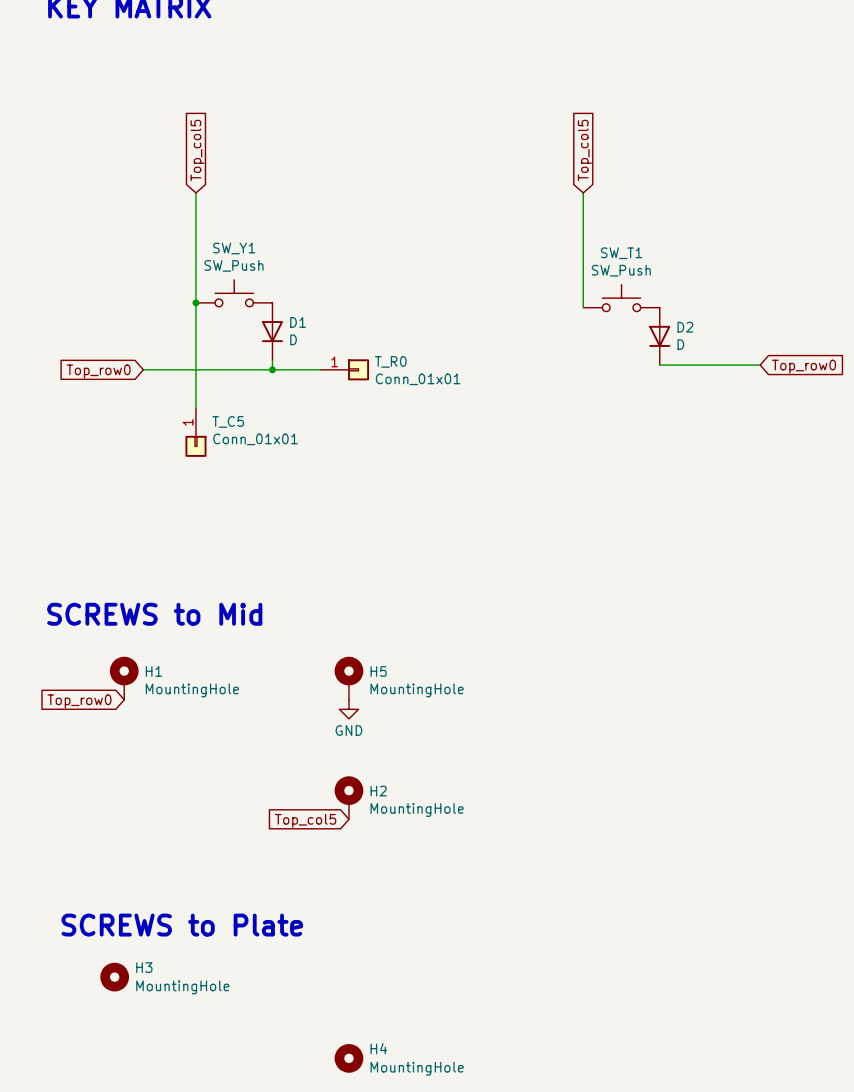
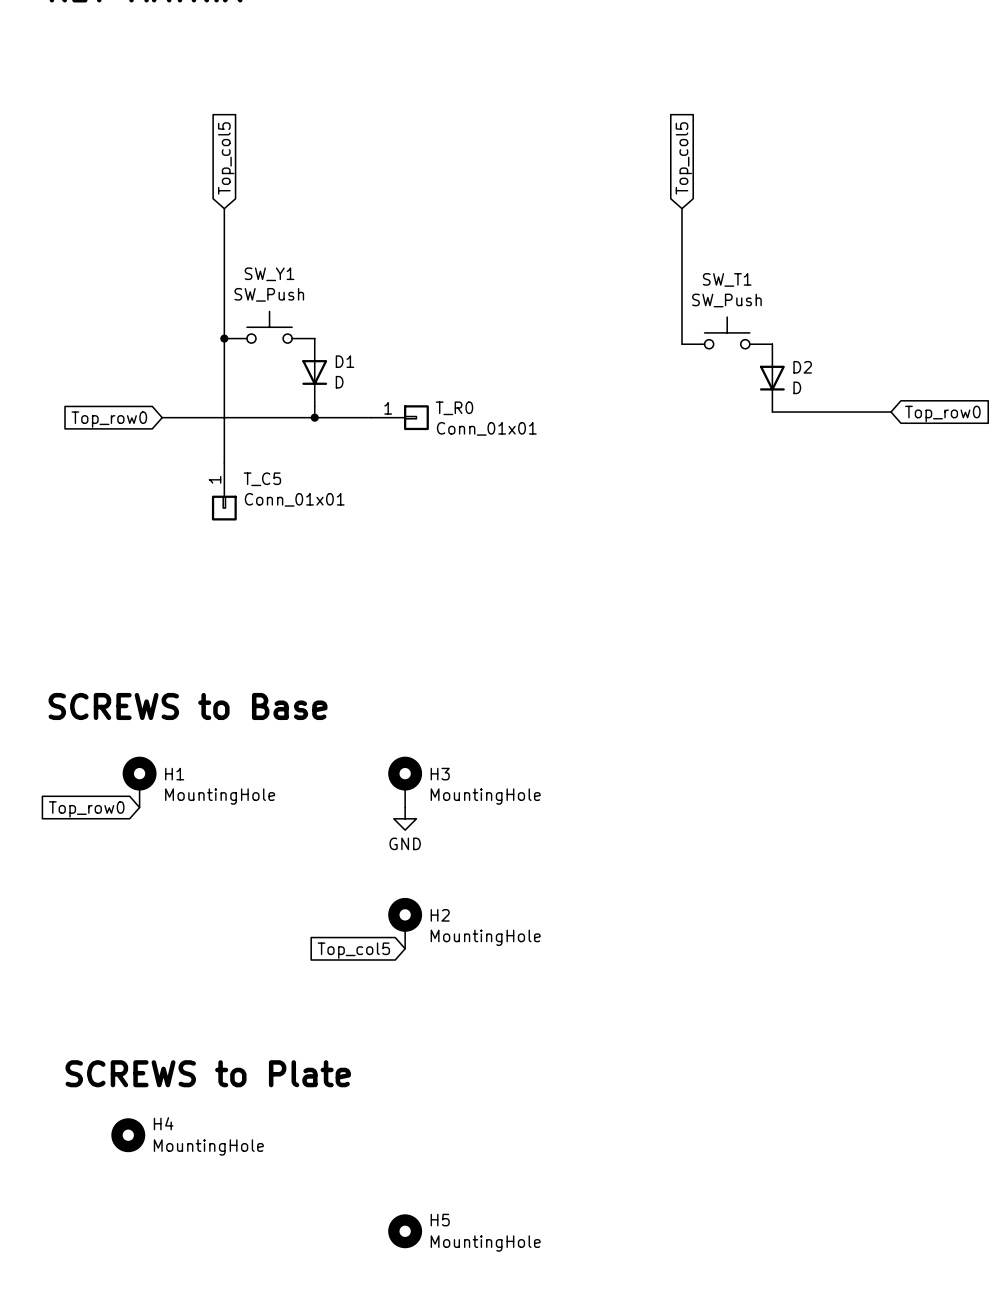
text: SCREWS to Mid (154, 614) -> SCREWS to Base (188, 706)
H5 name: H5 (378, 671) -> H3 (440, 774)
H3 name: H3 (144, 967) -> H4 (163, 1123)
H4 name: H4 (378, 1048) -> H5 (440, 1220)

